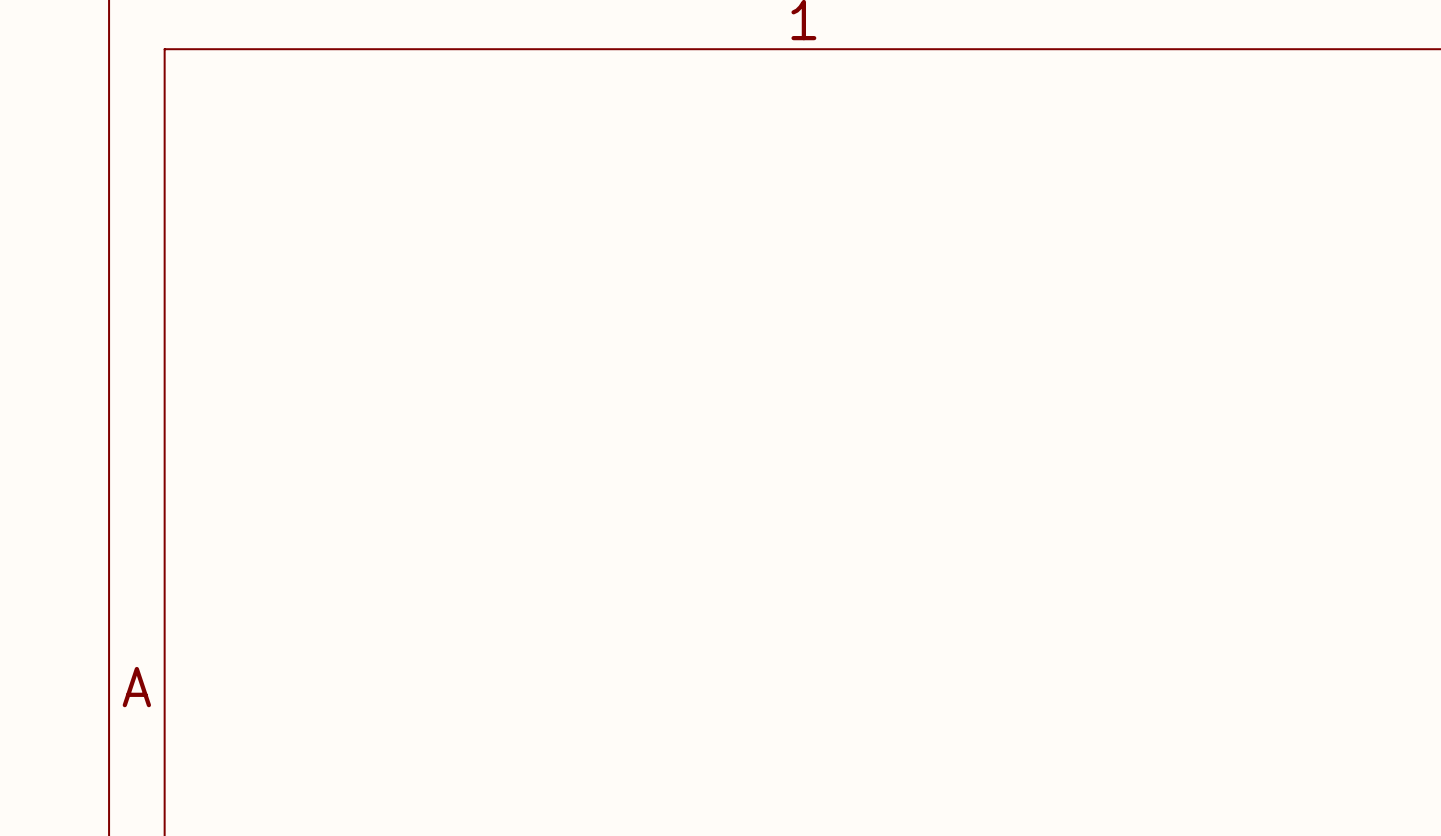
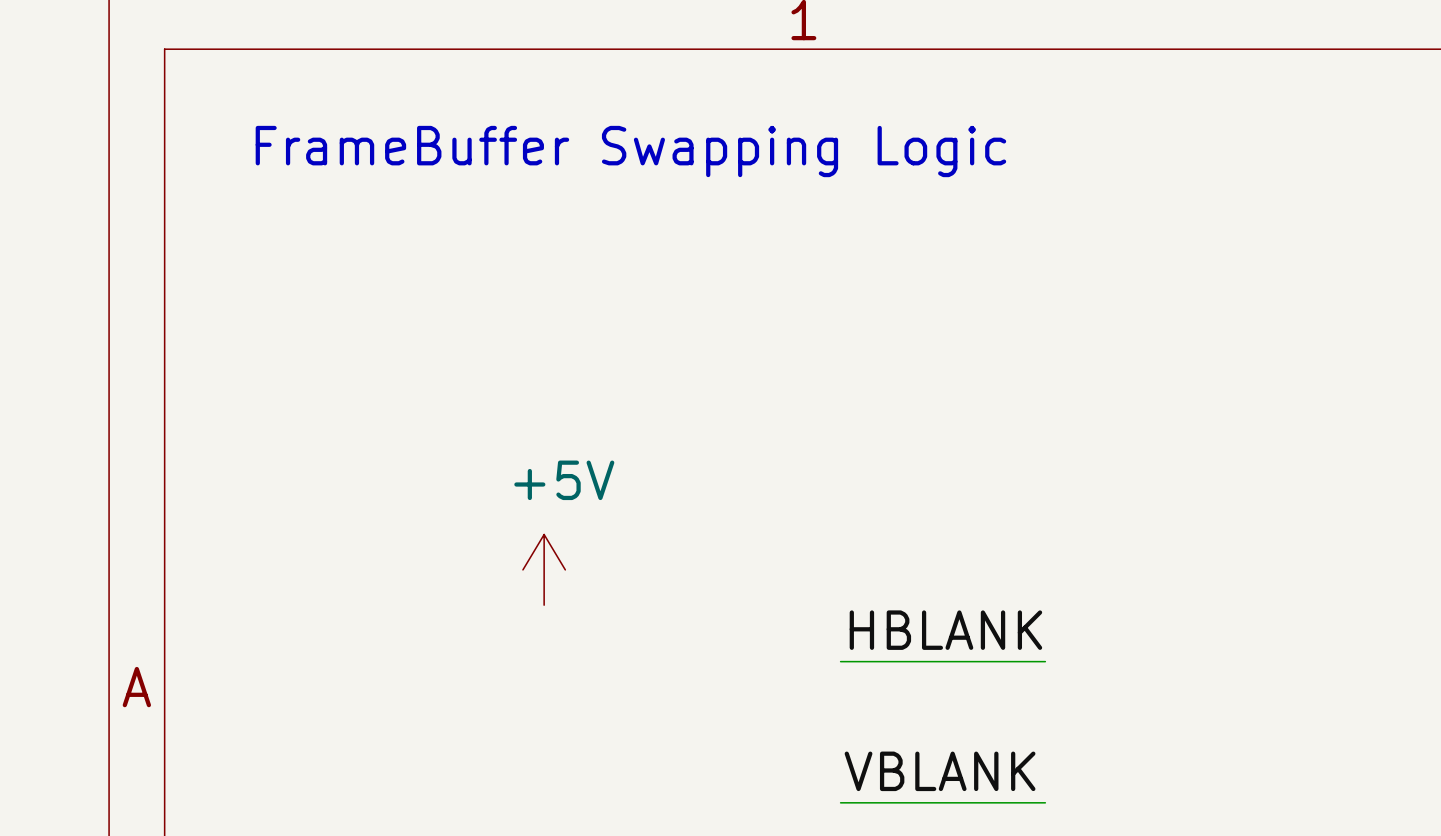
text: none -> FrameBuffer Swapping Logic (630, 151)
power symbol: none -> +5V (544, 569)
label: none -> HBLANK (945, 630)
wire: none -> (840, 661) (1045, 661)
label: none -> VBLANK (940, 771)
wire: none -> (840, 802) (1045, 802)

